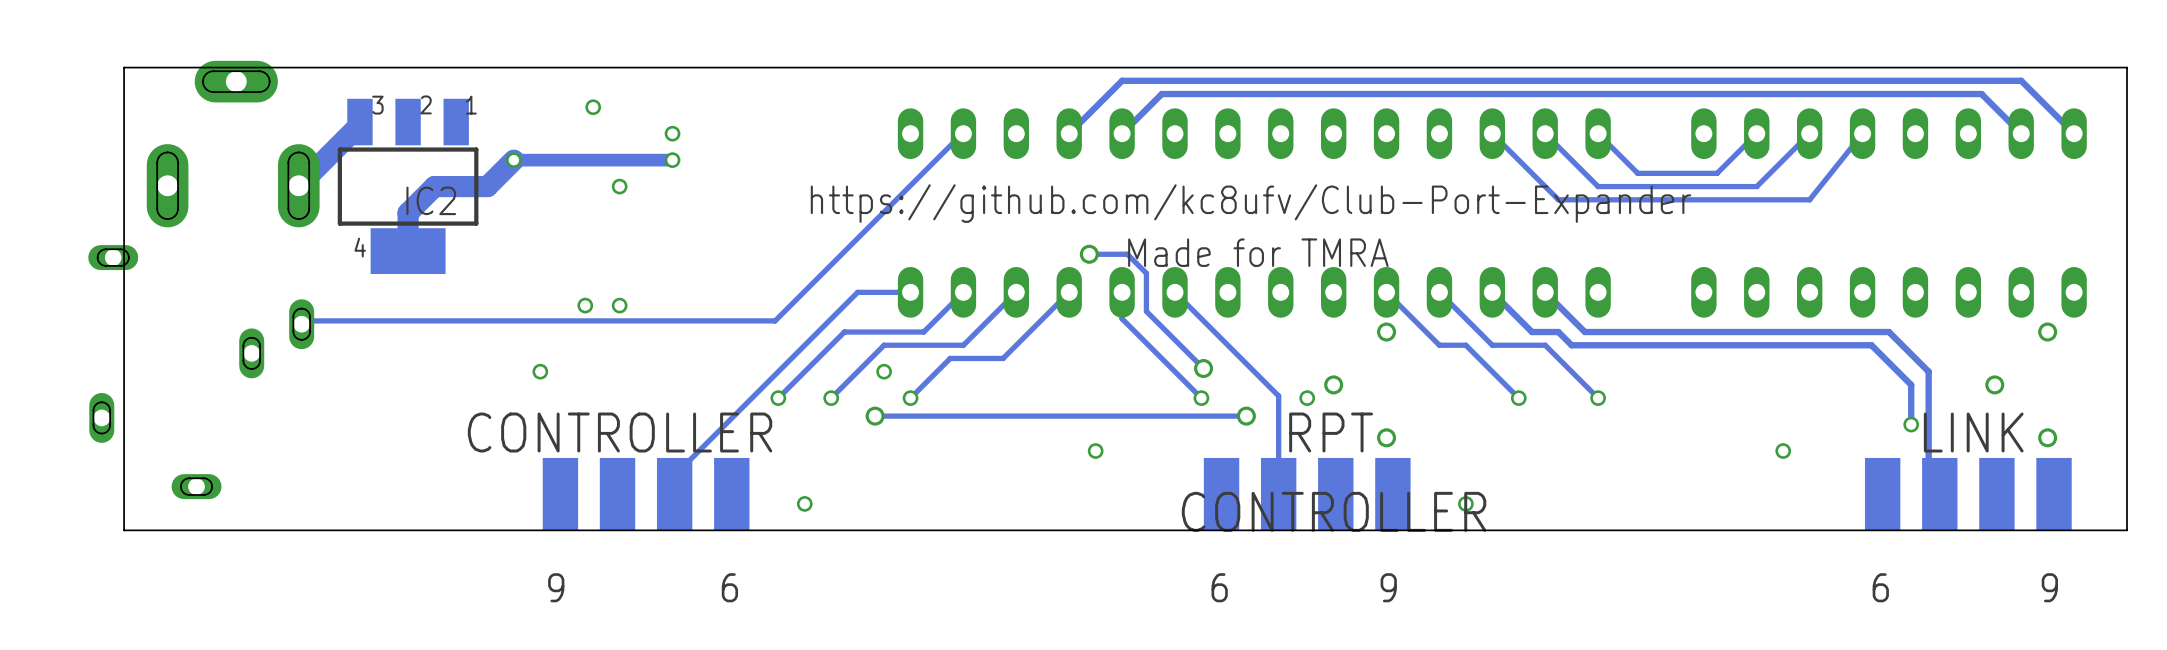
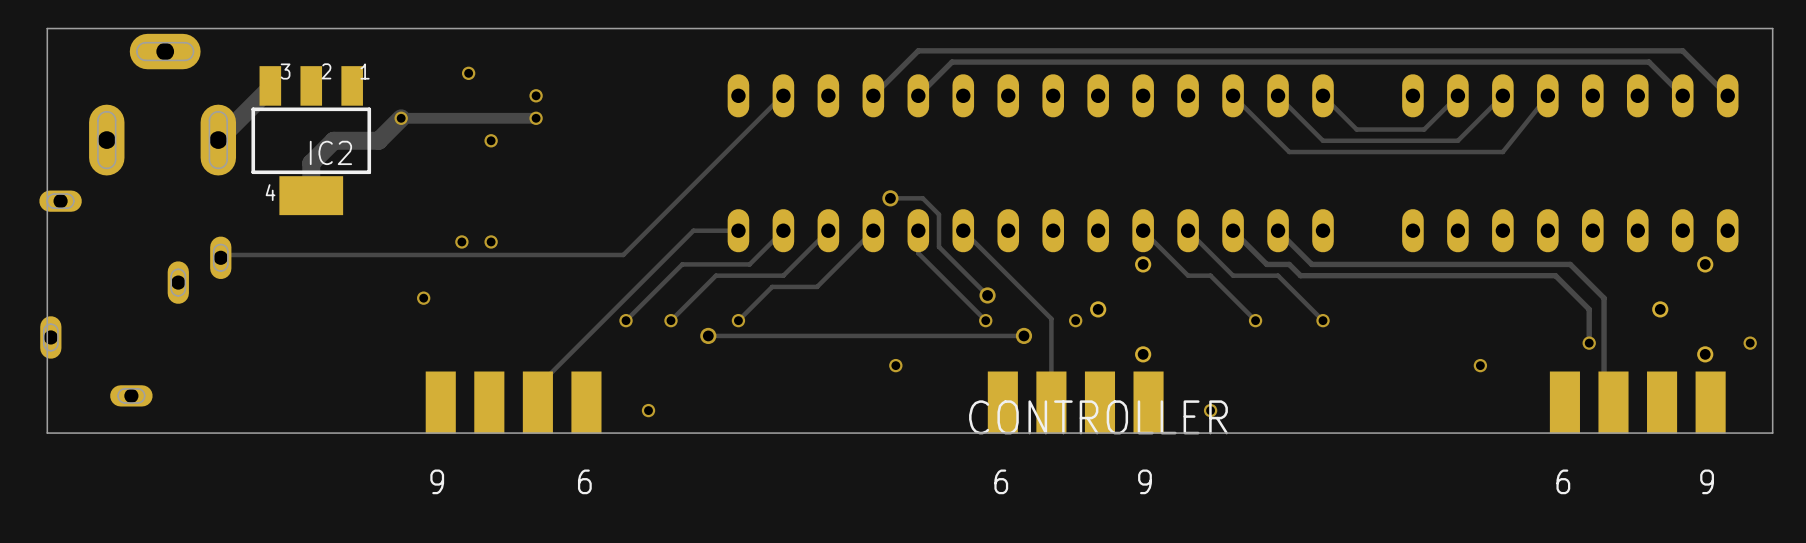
board edge: (2127, 67) (124, 67) (124, 530) -> (1772, 39) (1772, 28) (47, 28) (47, 433) (69, 433)
text: https://github.com/kc8ufv/Club-Port-Expander (1250, 203) -> none
text: Made for TMRA (1258, 252) -> none
via: (884, 371) -> none
via: none -> (1750, 343)
text: CONTROLLER (620, 432) -> none
text: RPT (1331, 432) -> none
text: LINK (1973, 432) -> none

